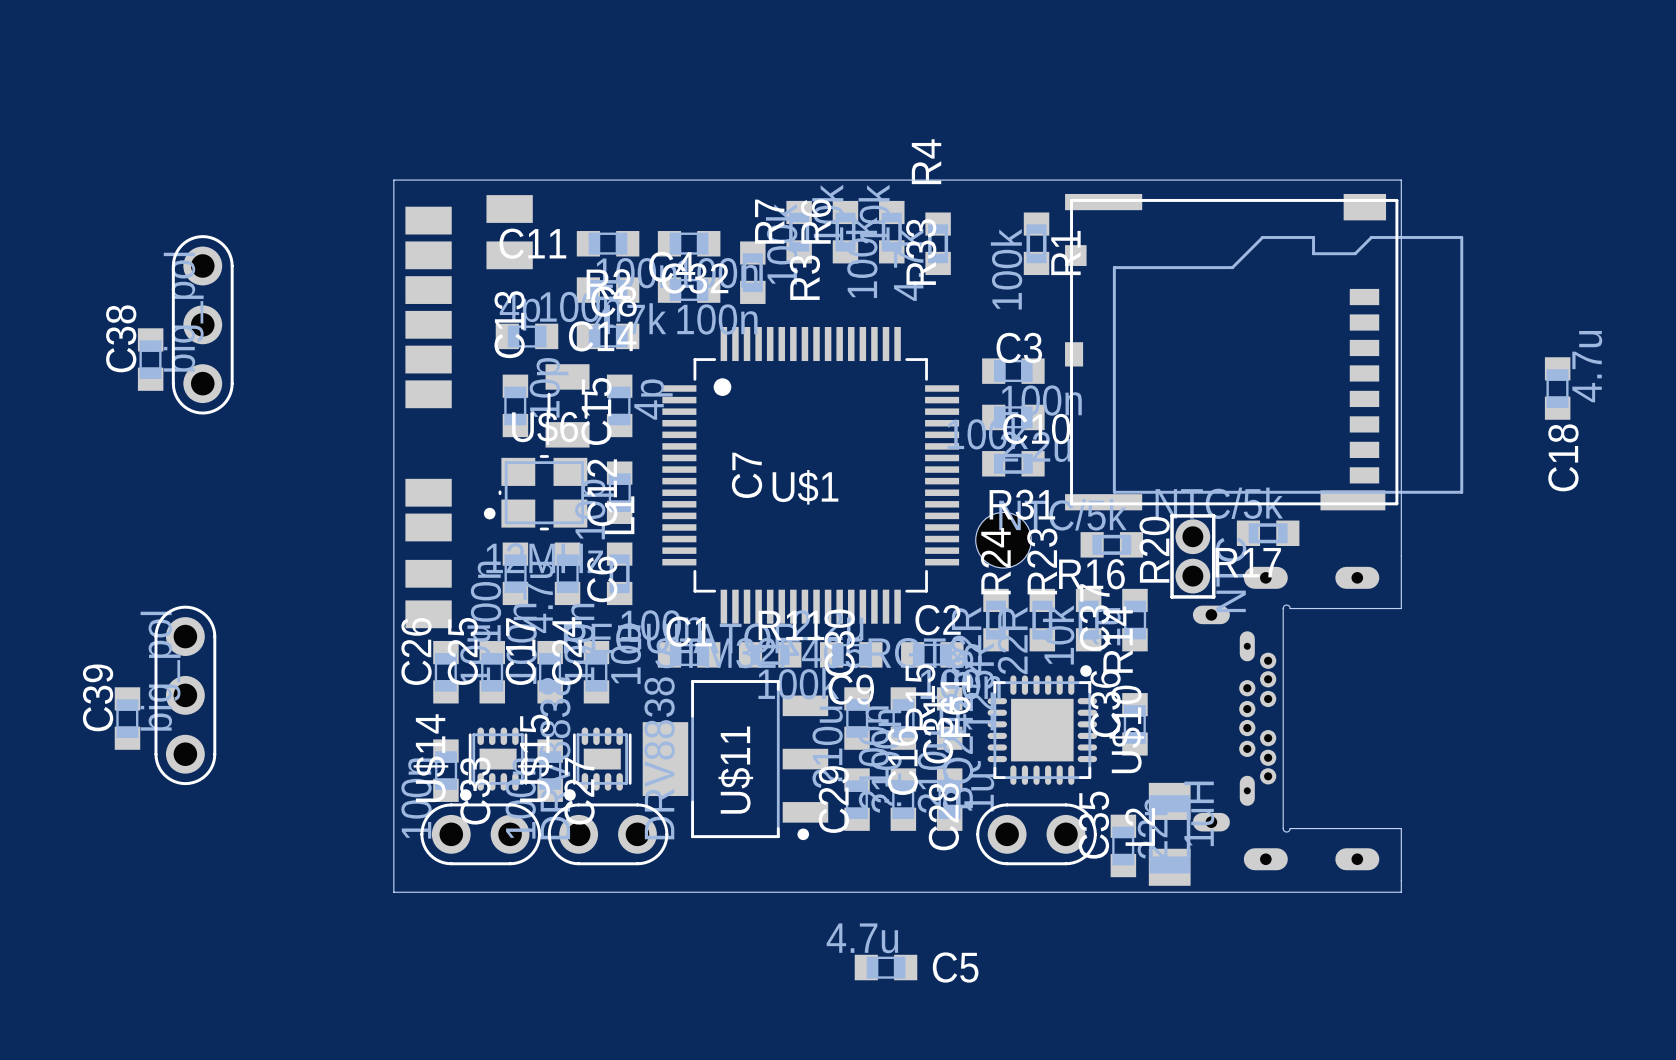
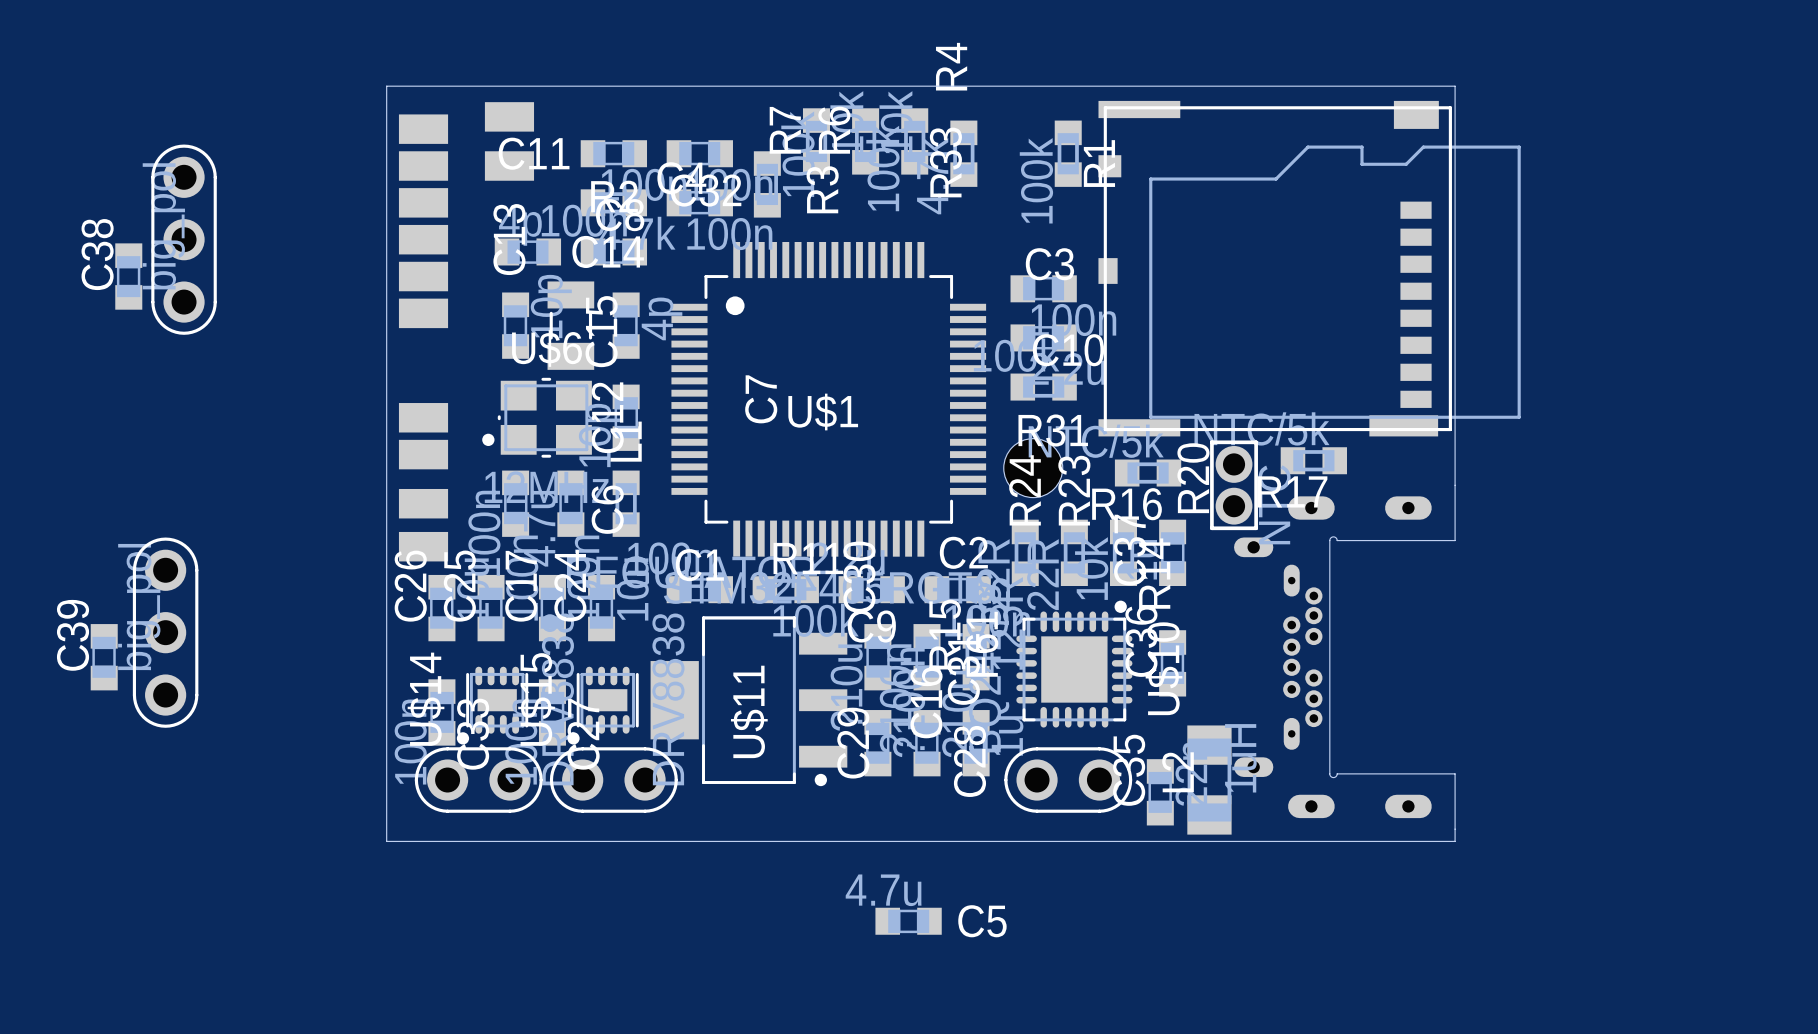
C18: 4.7u (1557, 388) -> none

